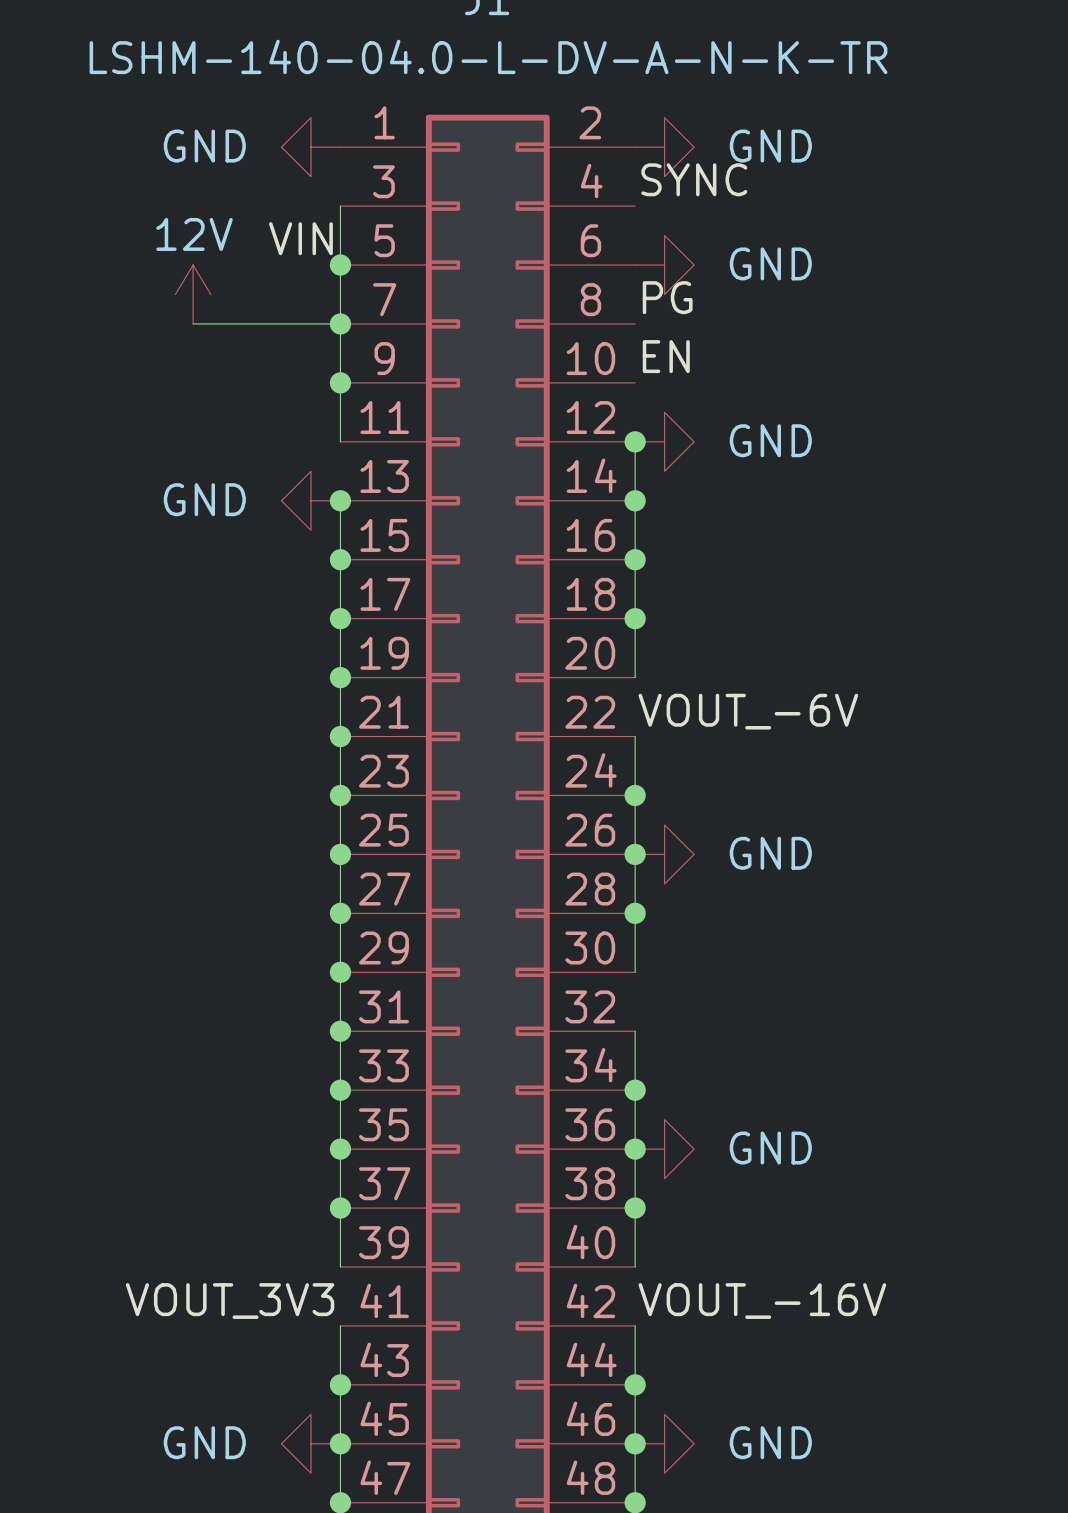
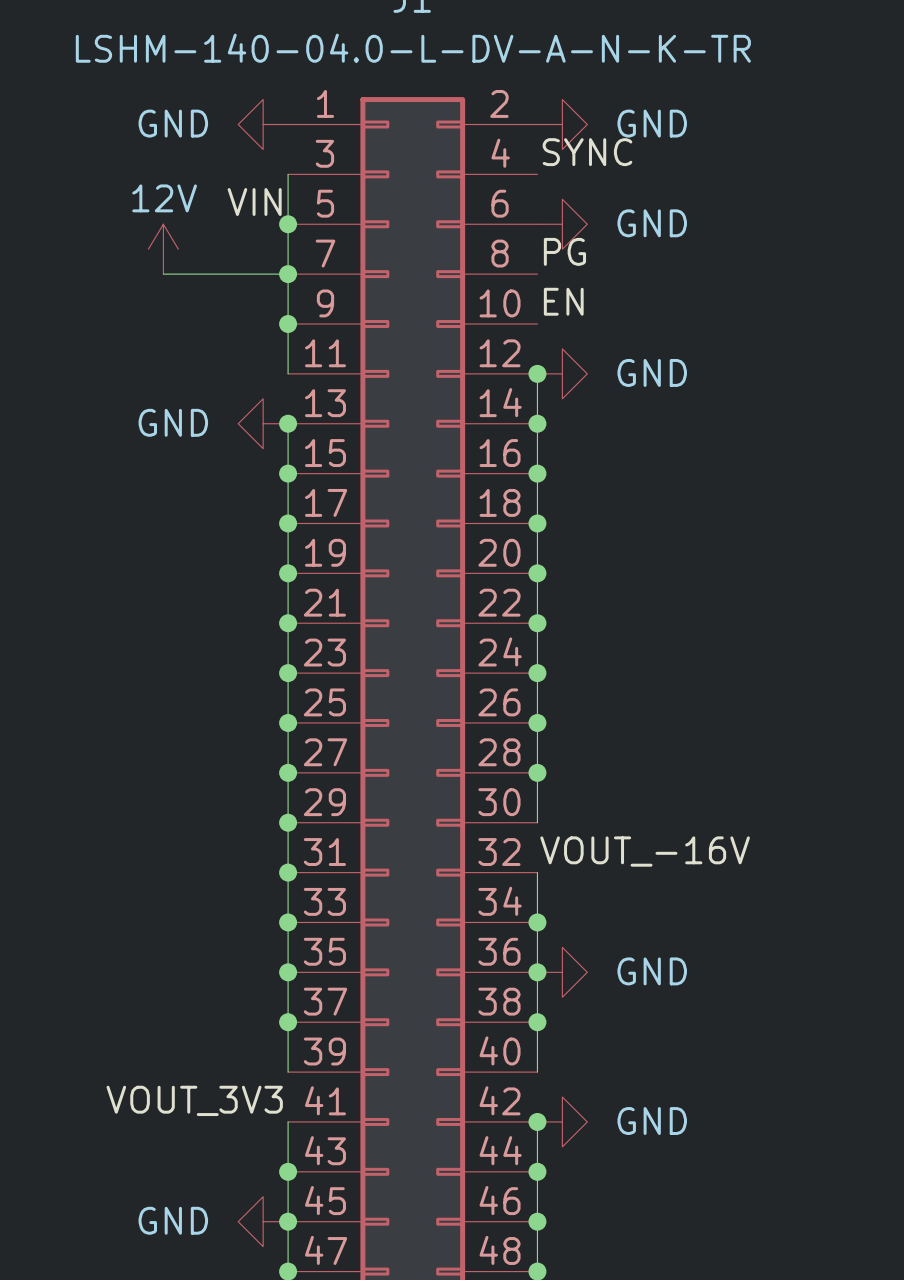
wire: none -> (537, 573) (537, 623)
junction: none -> (537, 573)
label: VOUT_-6V (748, 711) -> none
junction: none -> (537, 623)
power symbol: GND (664, 854) -> none
label position: VOUT_-16V (762, 1301) -> VOUT_-16V (645, 851)
junction: none -> (537, 1121)
power symbol position: GND (664, 1443) -> GND (562, 1121)

